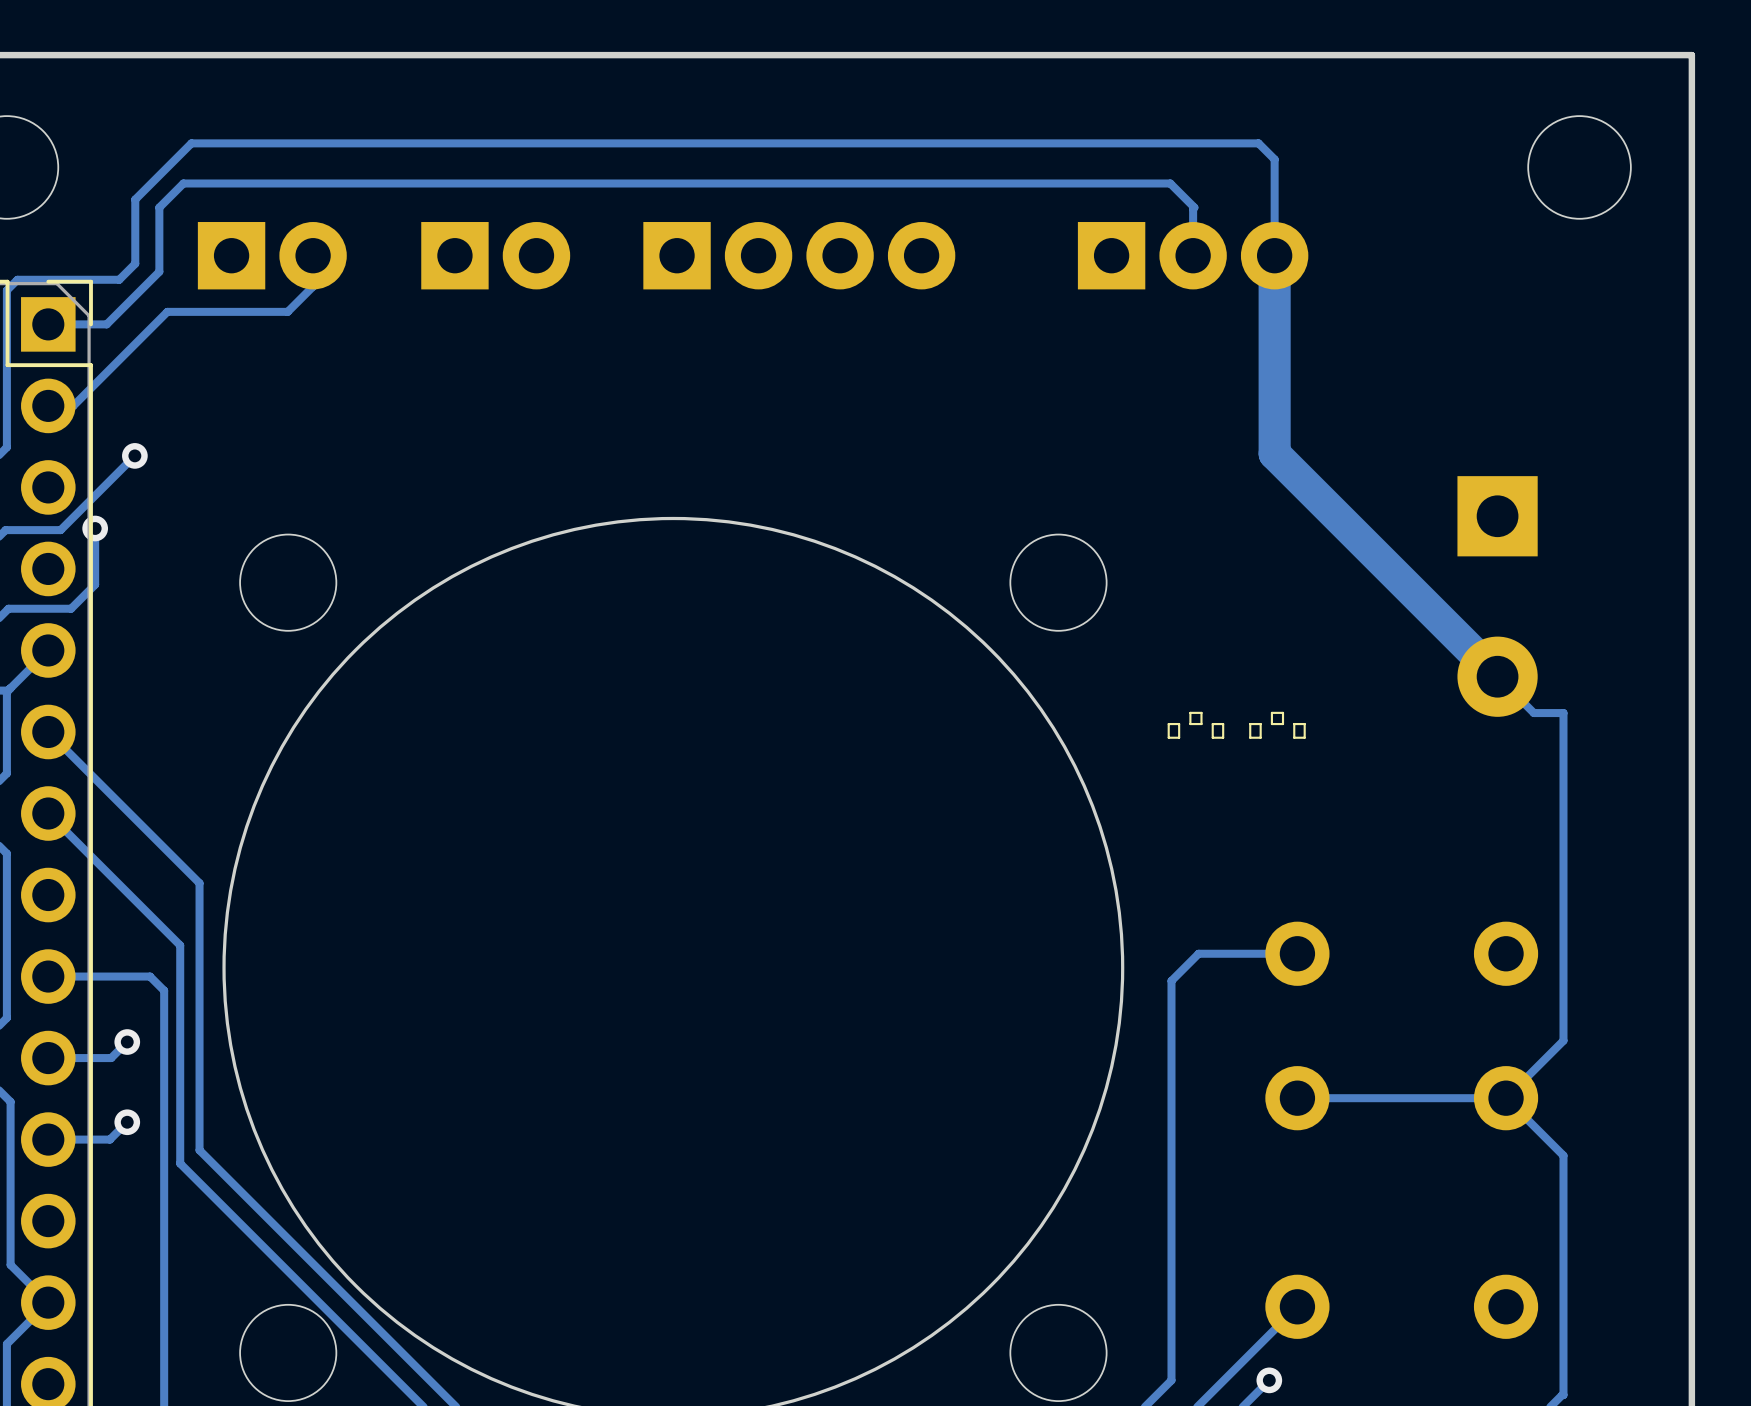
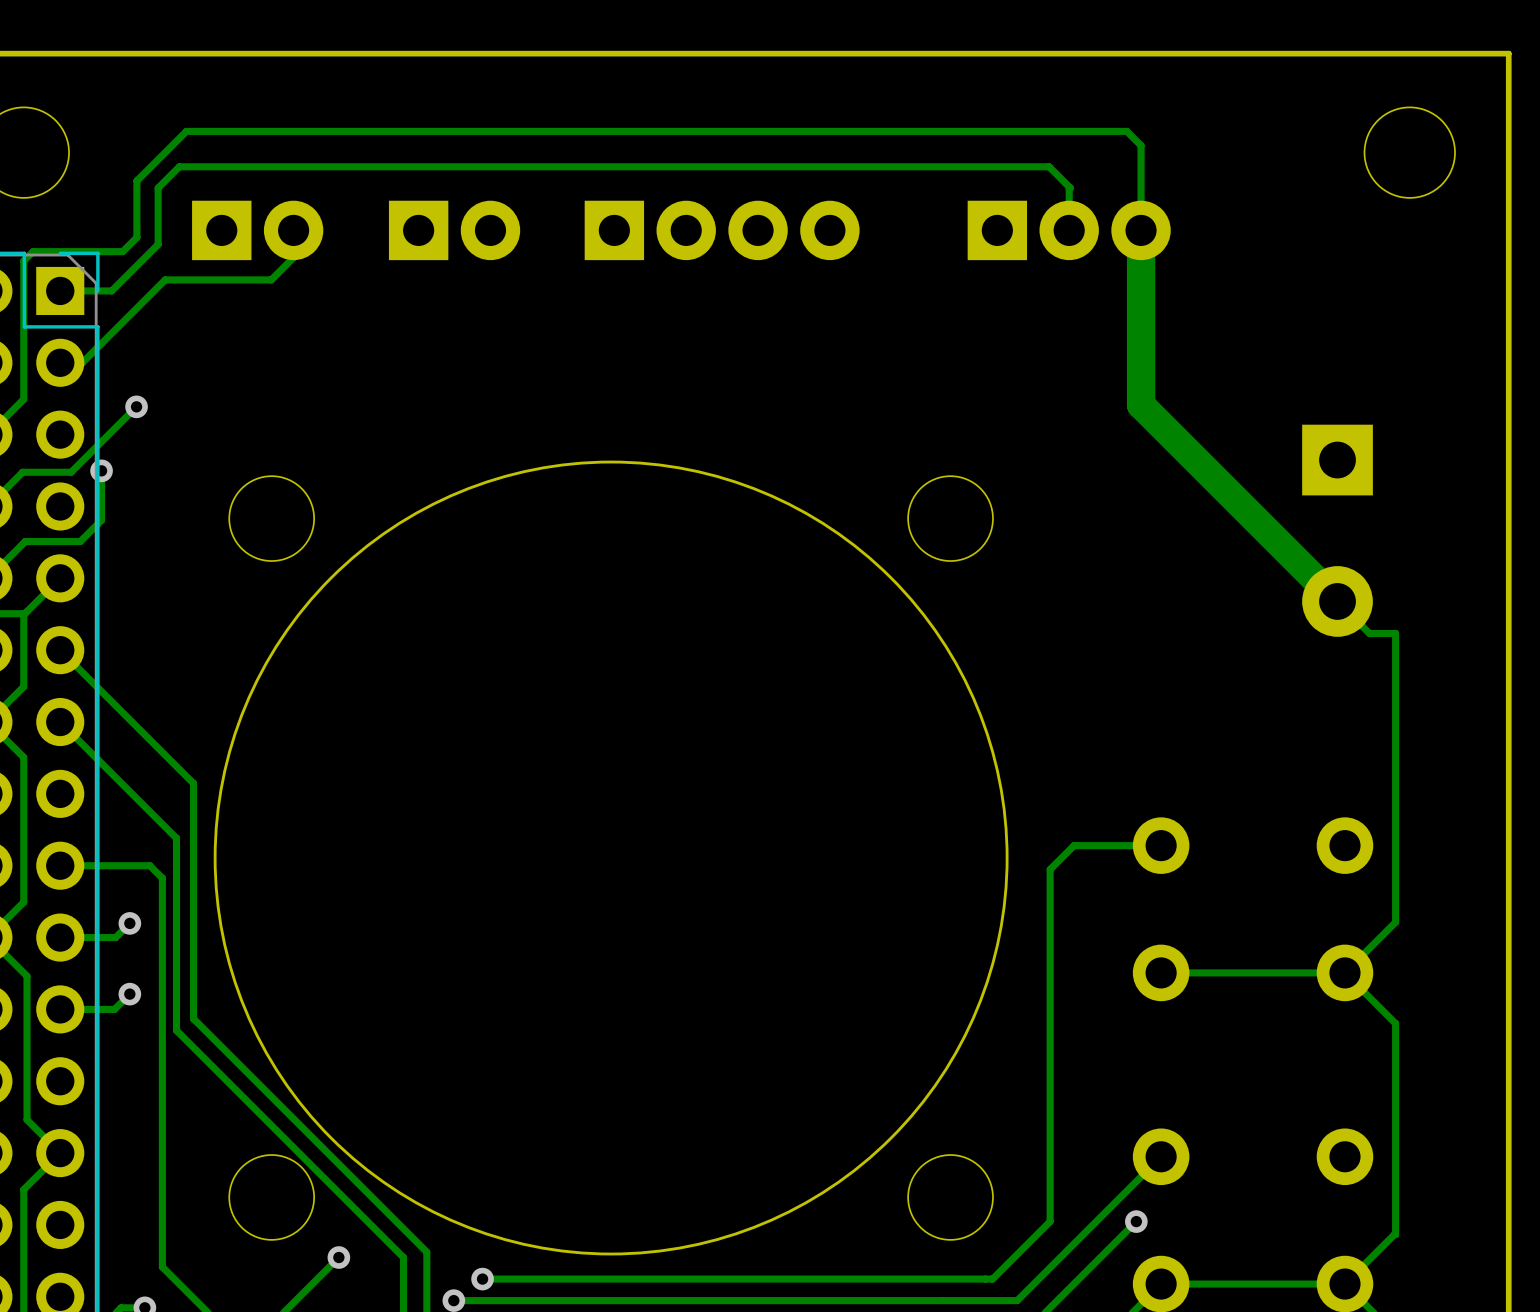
part: (1195, 725) -> none
part: (1277, 725) -> none

